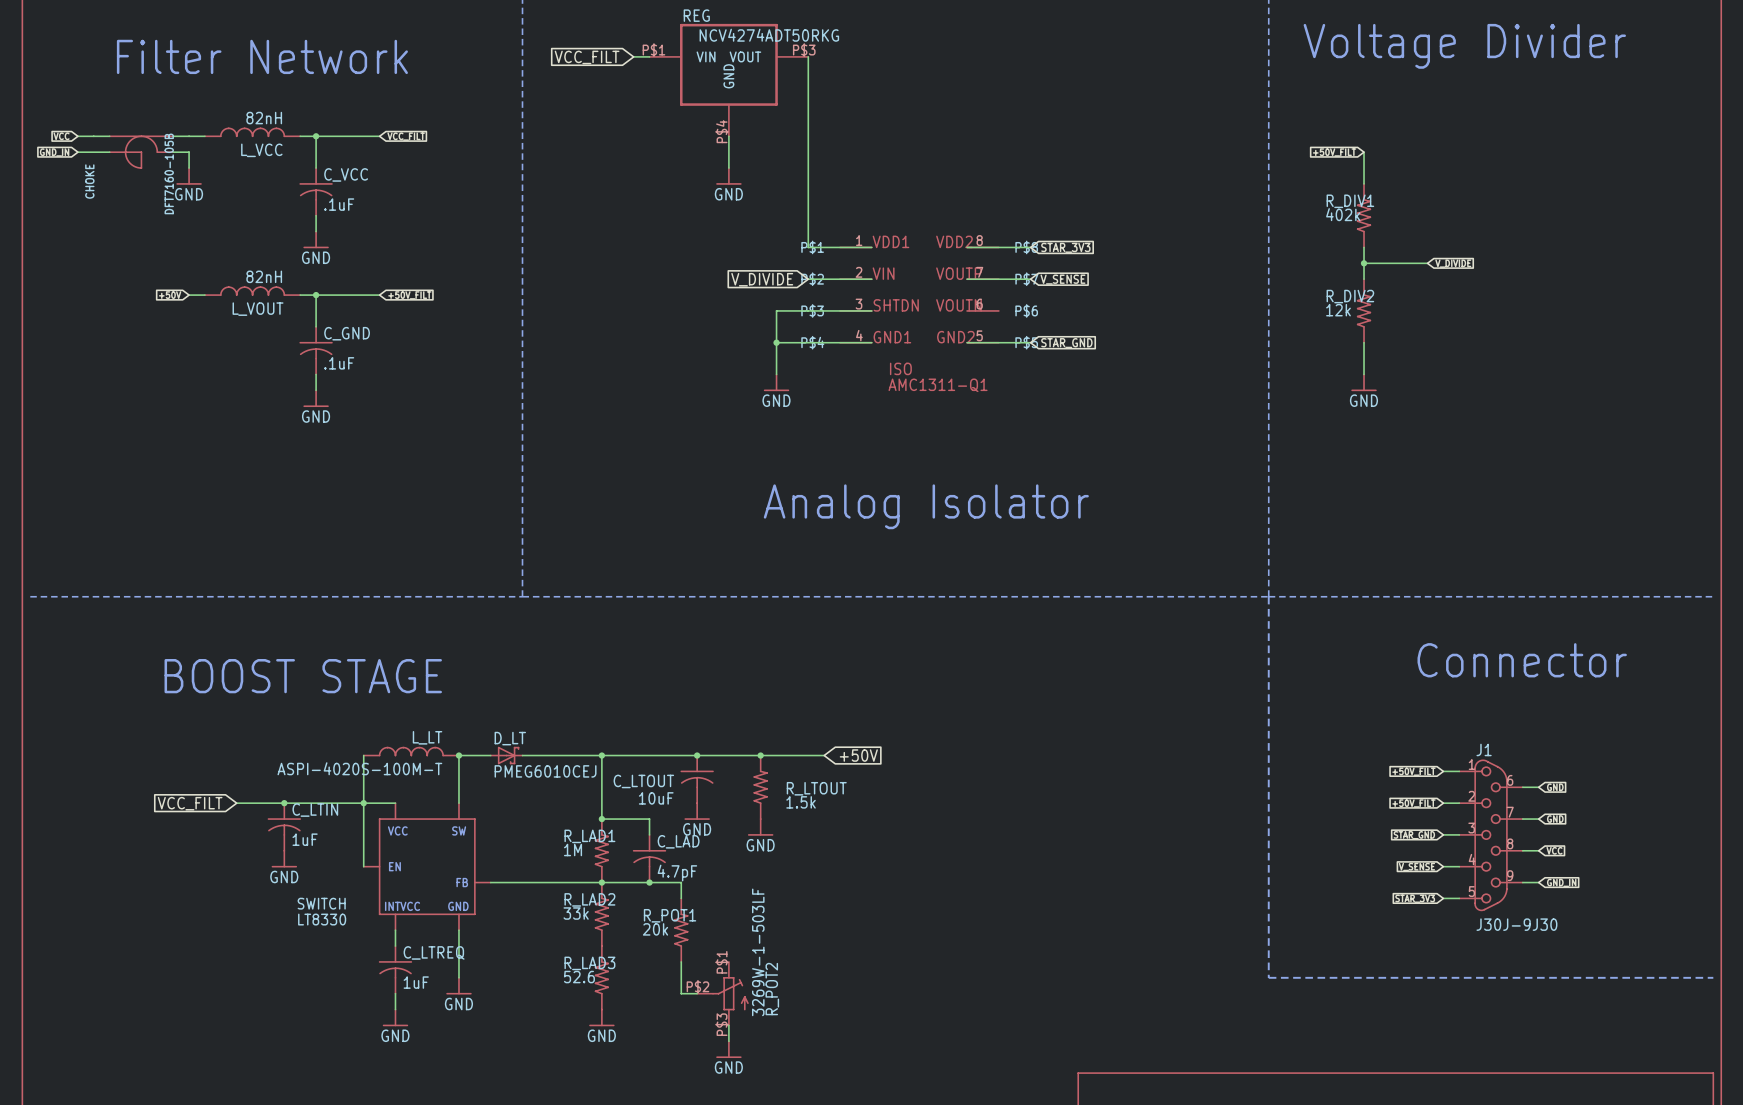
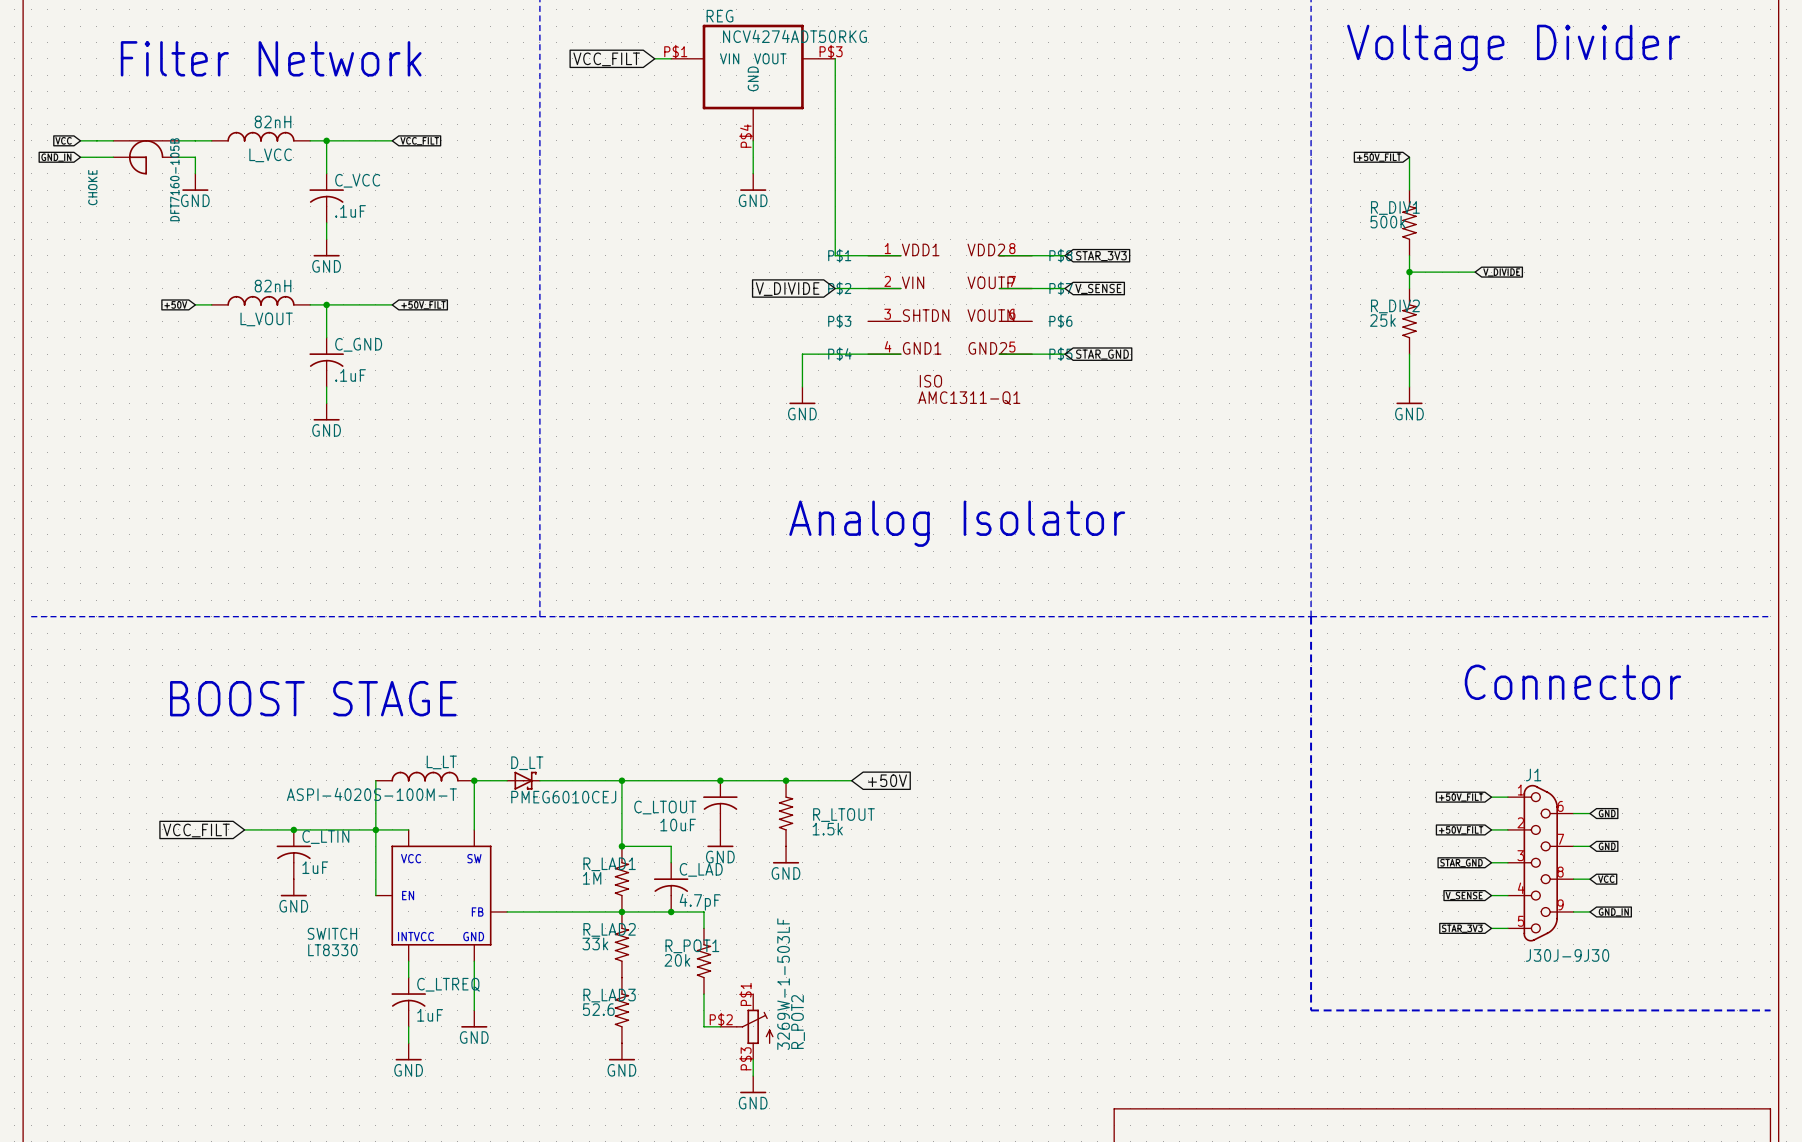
R_DIV1 value: 402k (1343, 214) -> 500k (1388, 222)
wire: (871, 310) (776, 310) (776, 342) -> none
R_DIV2 value: 12k (1338, 310) -> 25k (1382, 320)
junction: (776, 342) -> none

